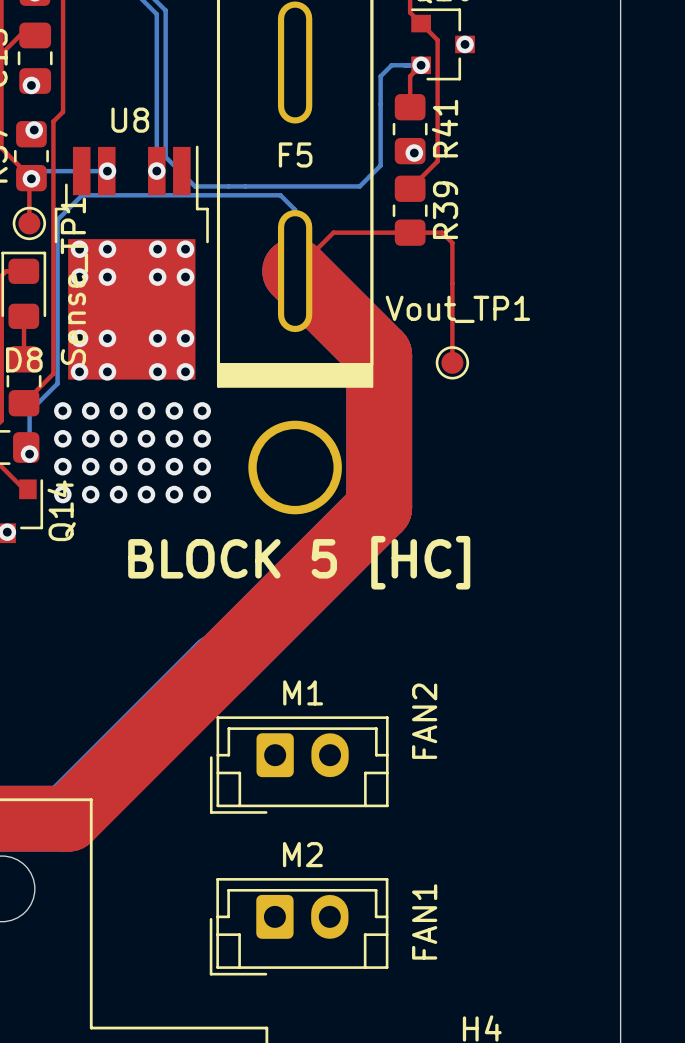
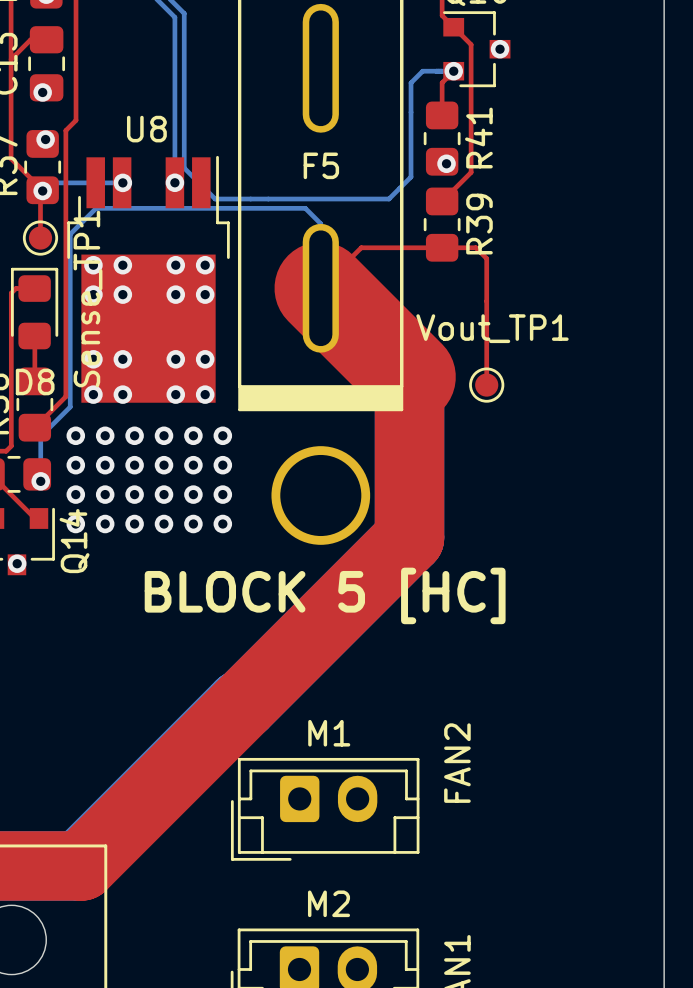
top track width: thin (295, 271) (379, 355) -> thick (320, 288) (409, 376)

